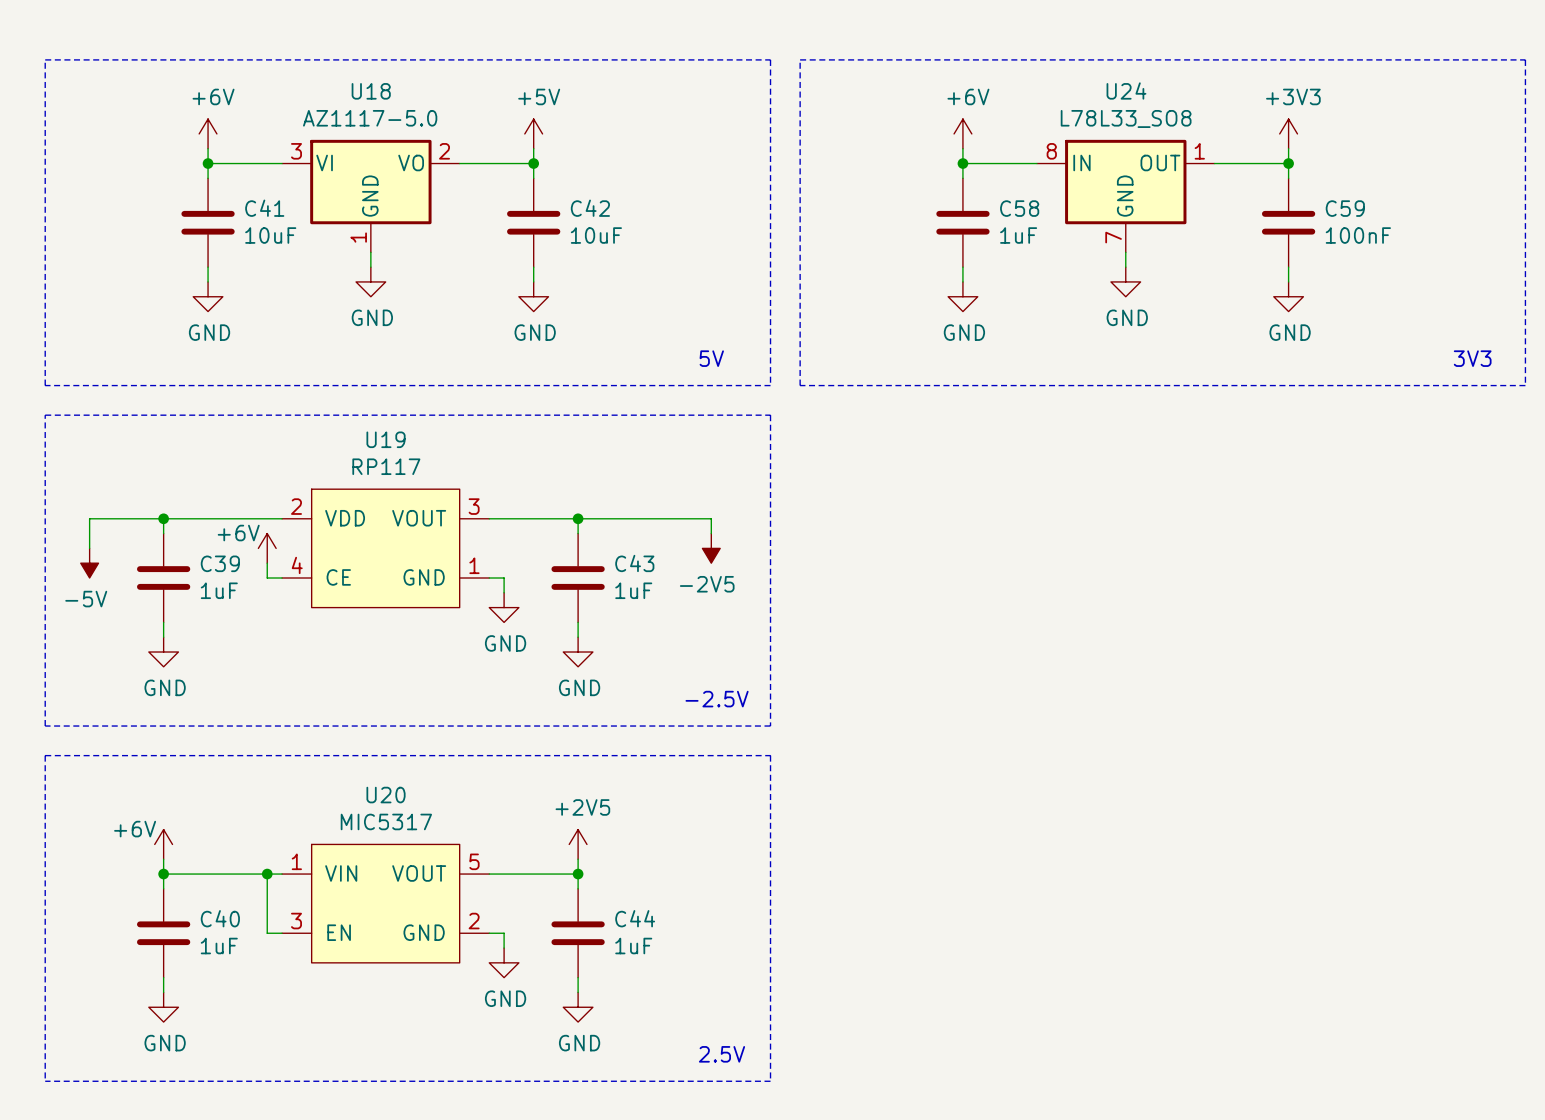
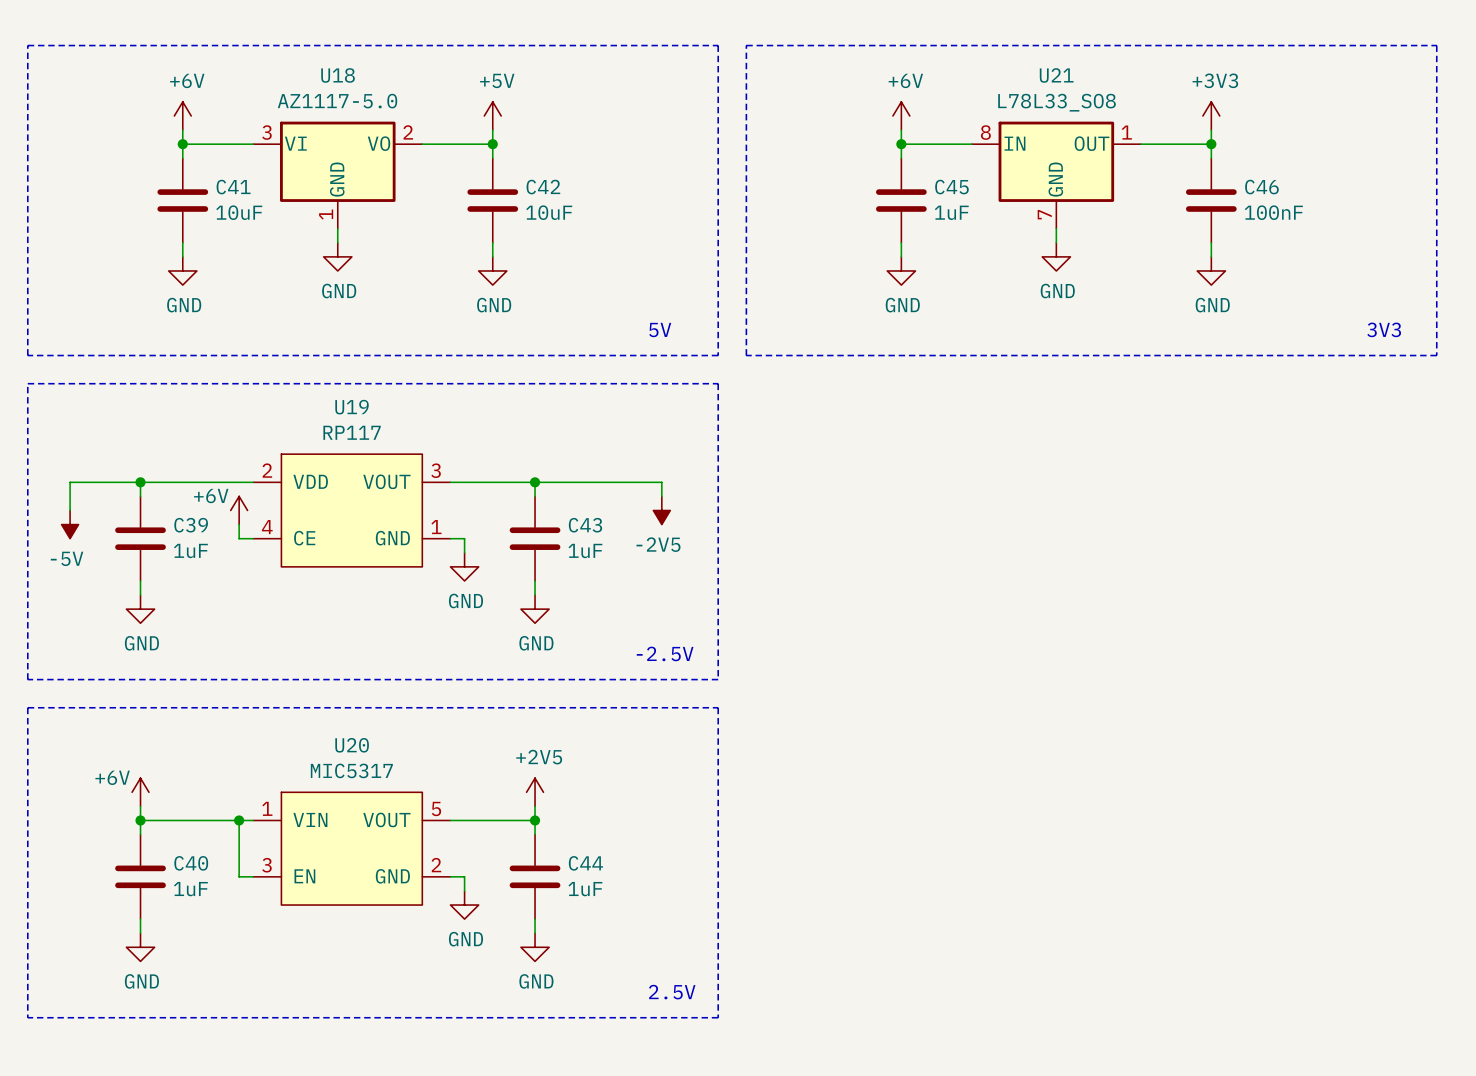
U24 name: U24 (1126, 90) -> U21 (1056, 75)
C58 name: C58 (1019, 208) -> C45 (951, 187)
C59 name: C59 (1345, 208) -> C46 (1261, 187)

